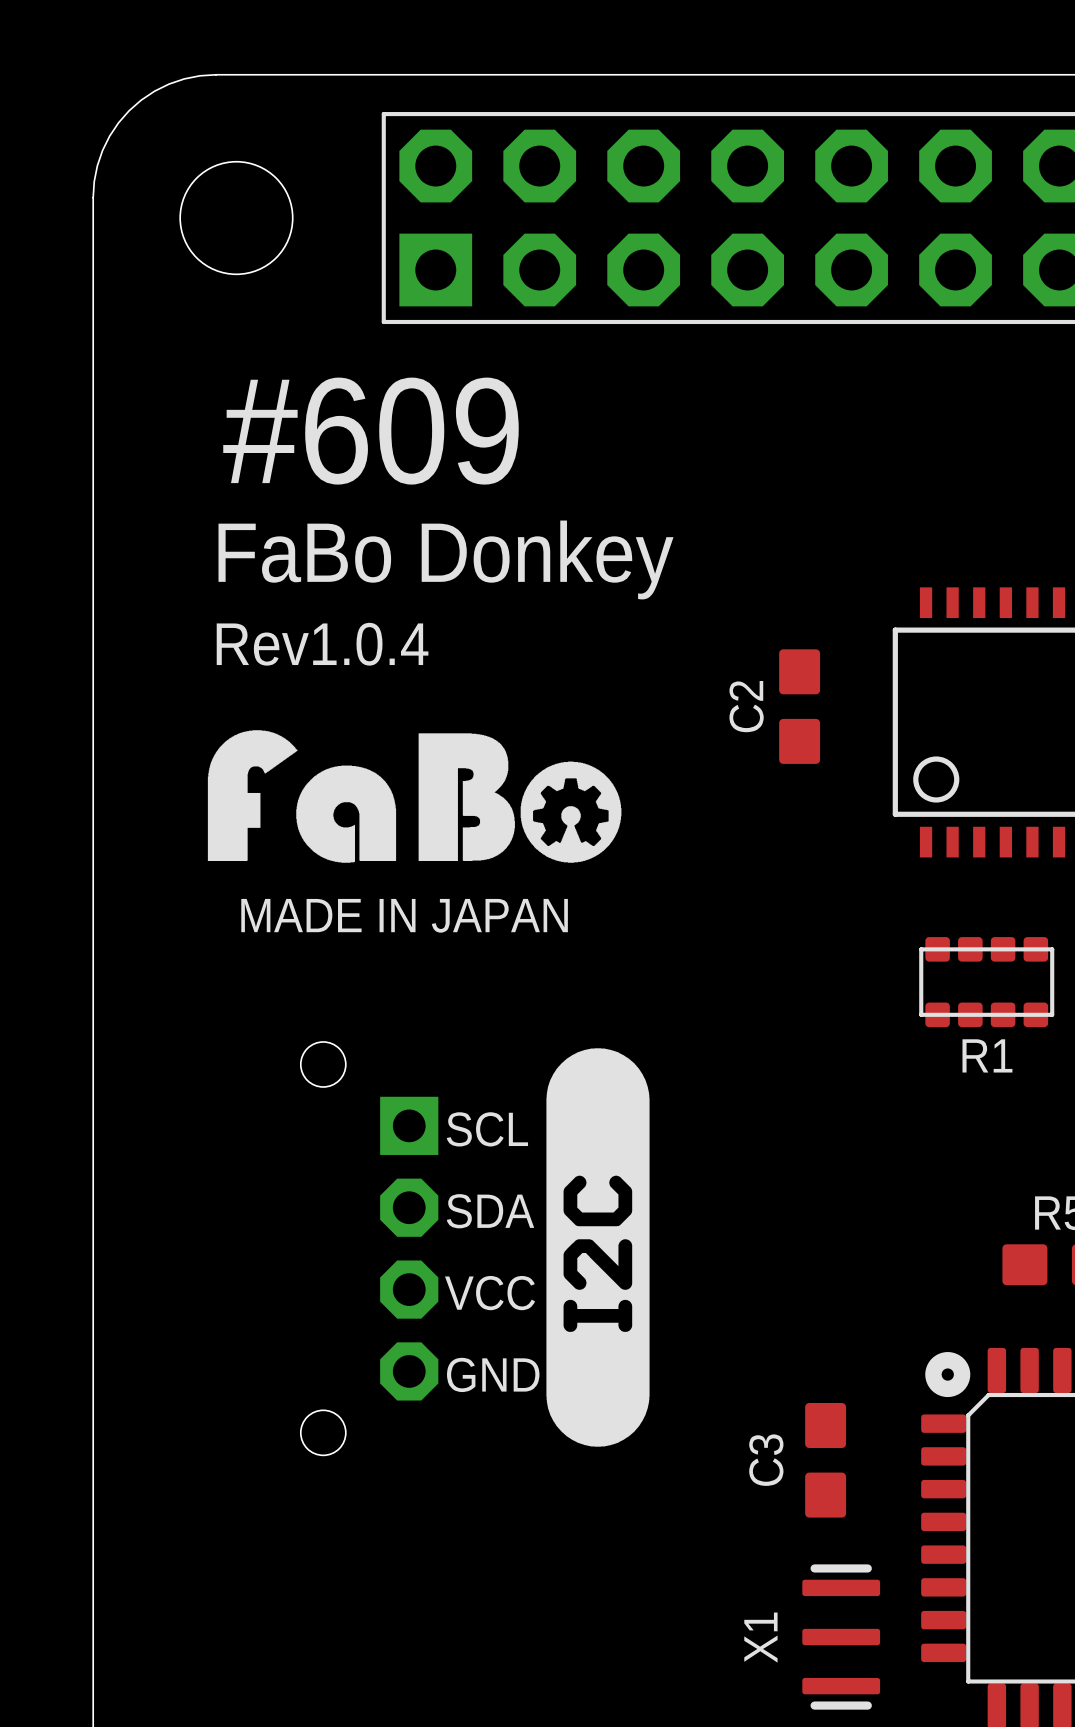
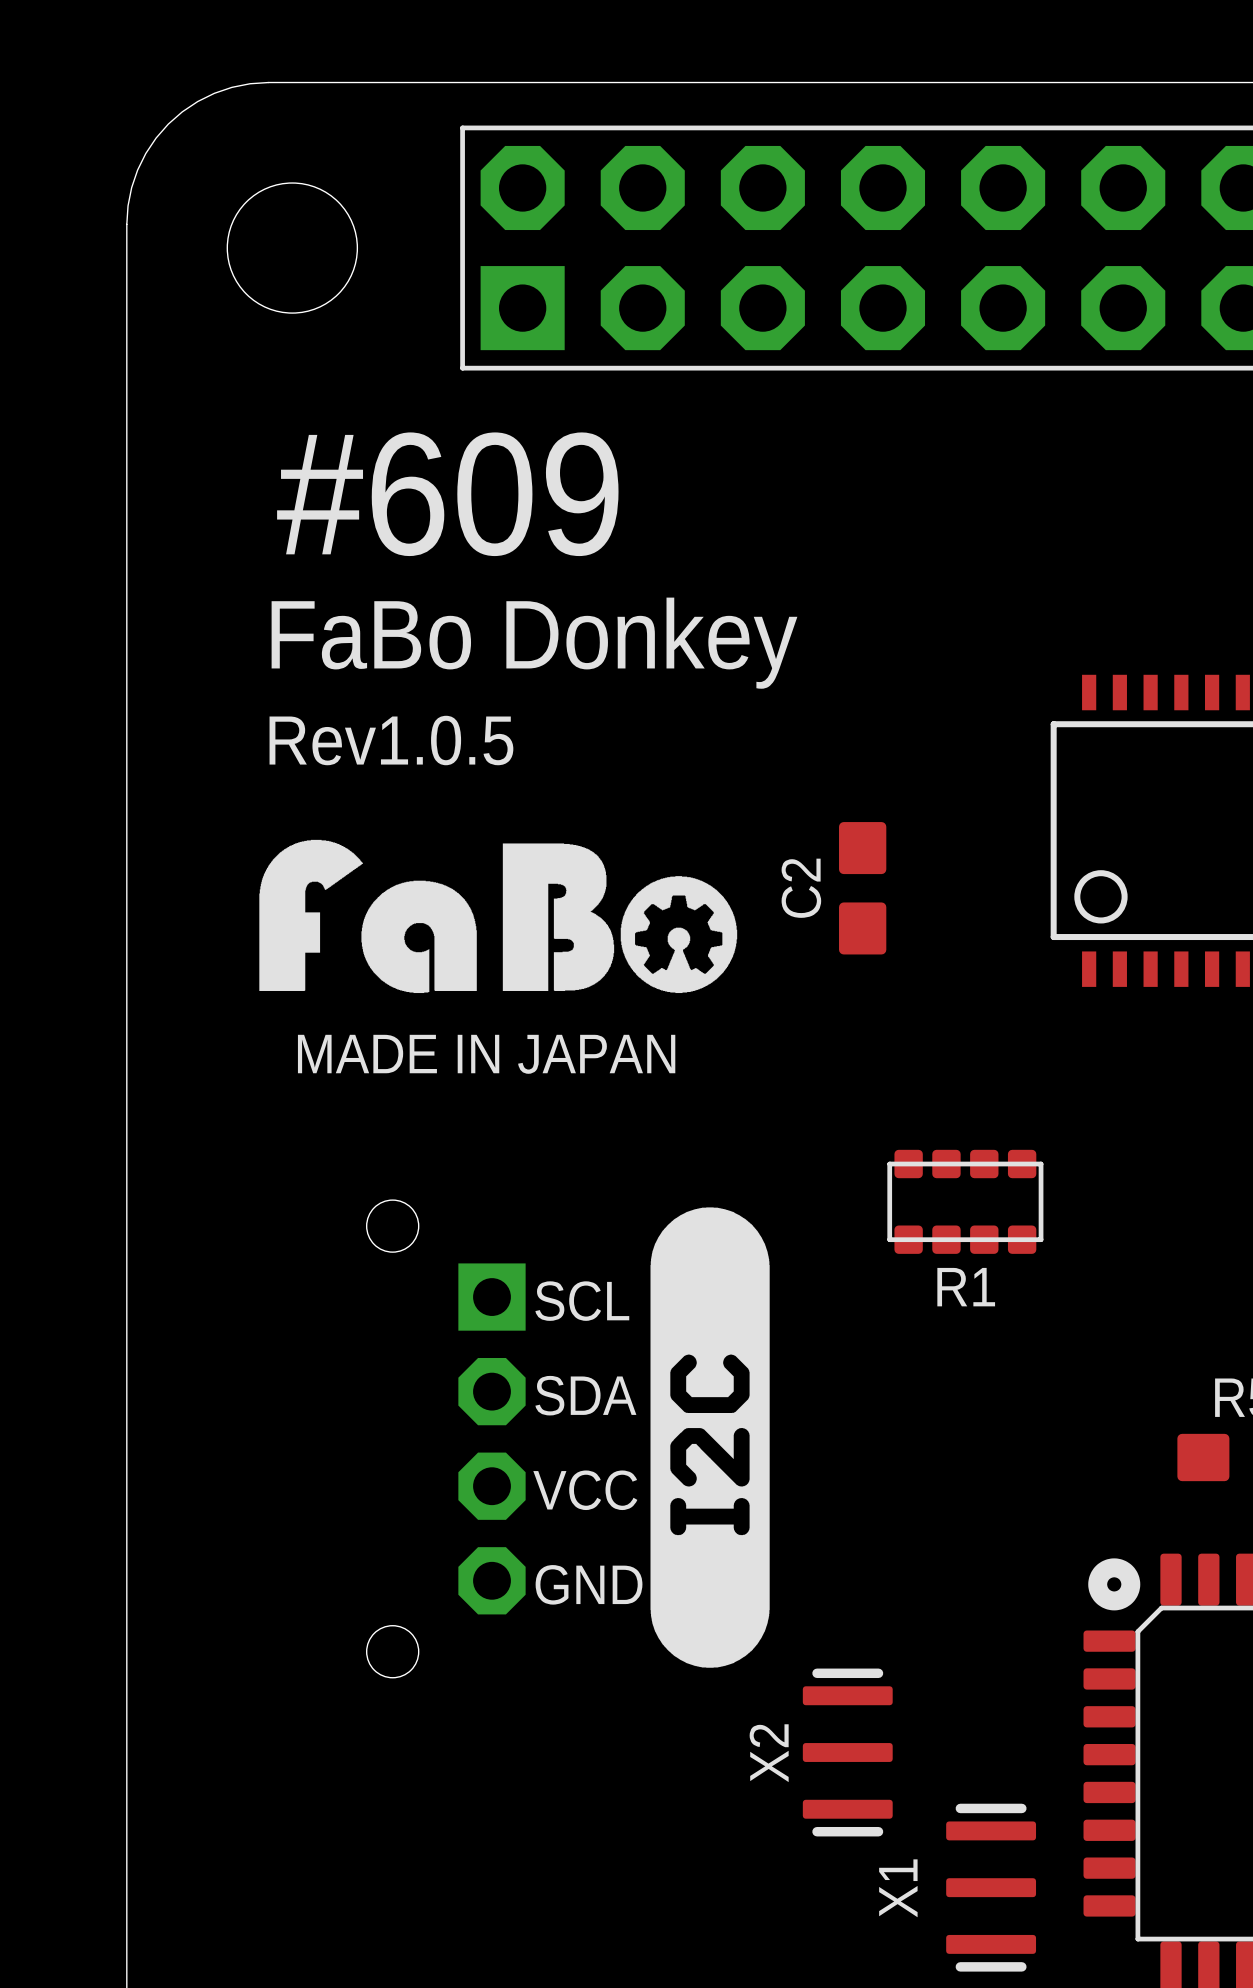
text: Rev1.0.4 (322, 644) -> Rev1.0.5 (391, 740)
C2 position: (799, 706) -> (862, 888)
R1 position: (986, 982) -> (965, 1201)
C3: (825, 1460) -> none
X2: none -> (847, 1752)

